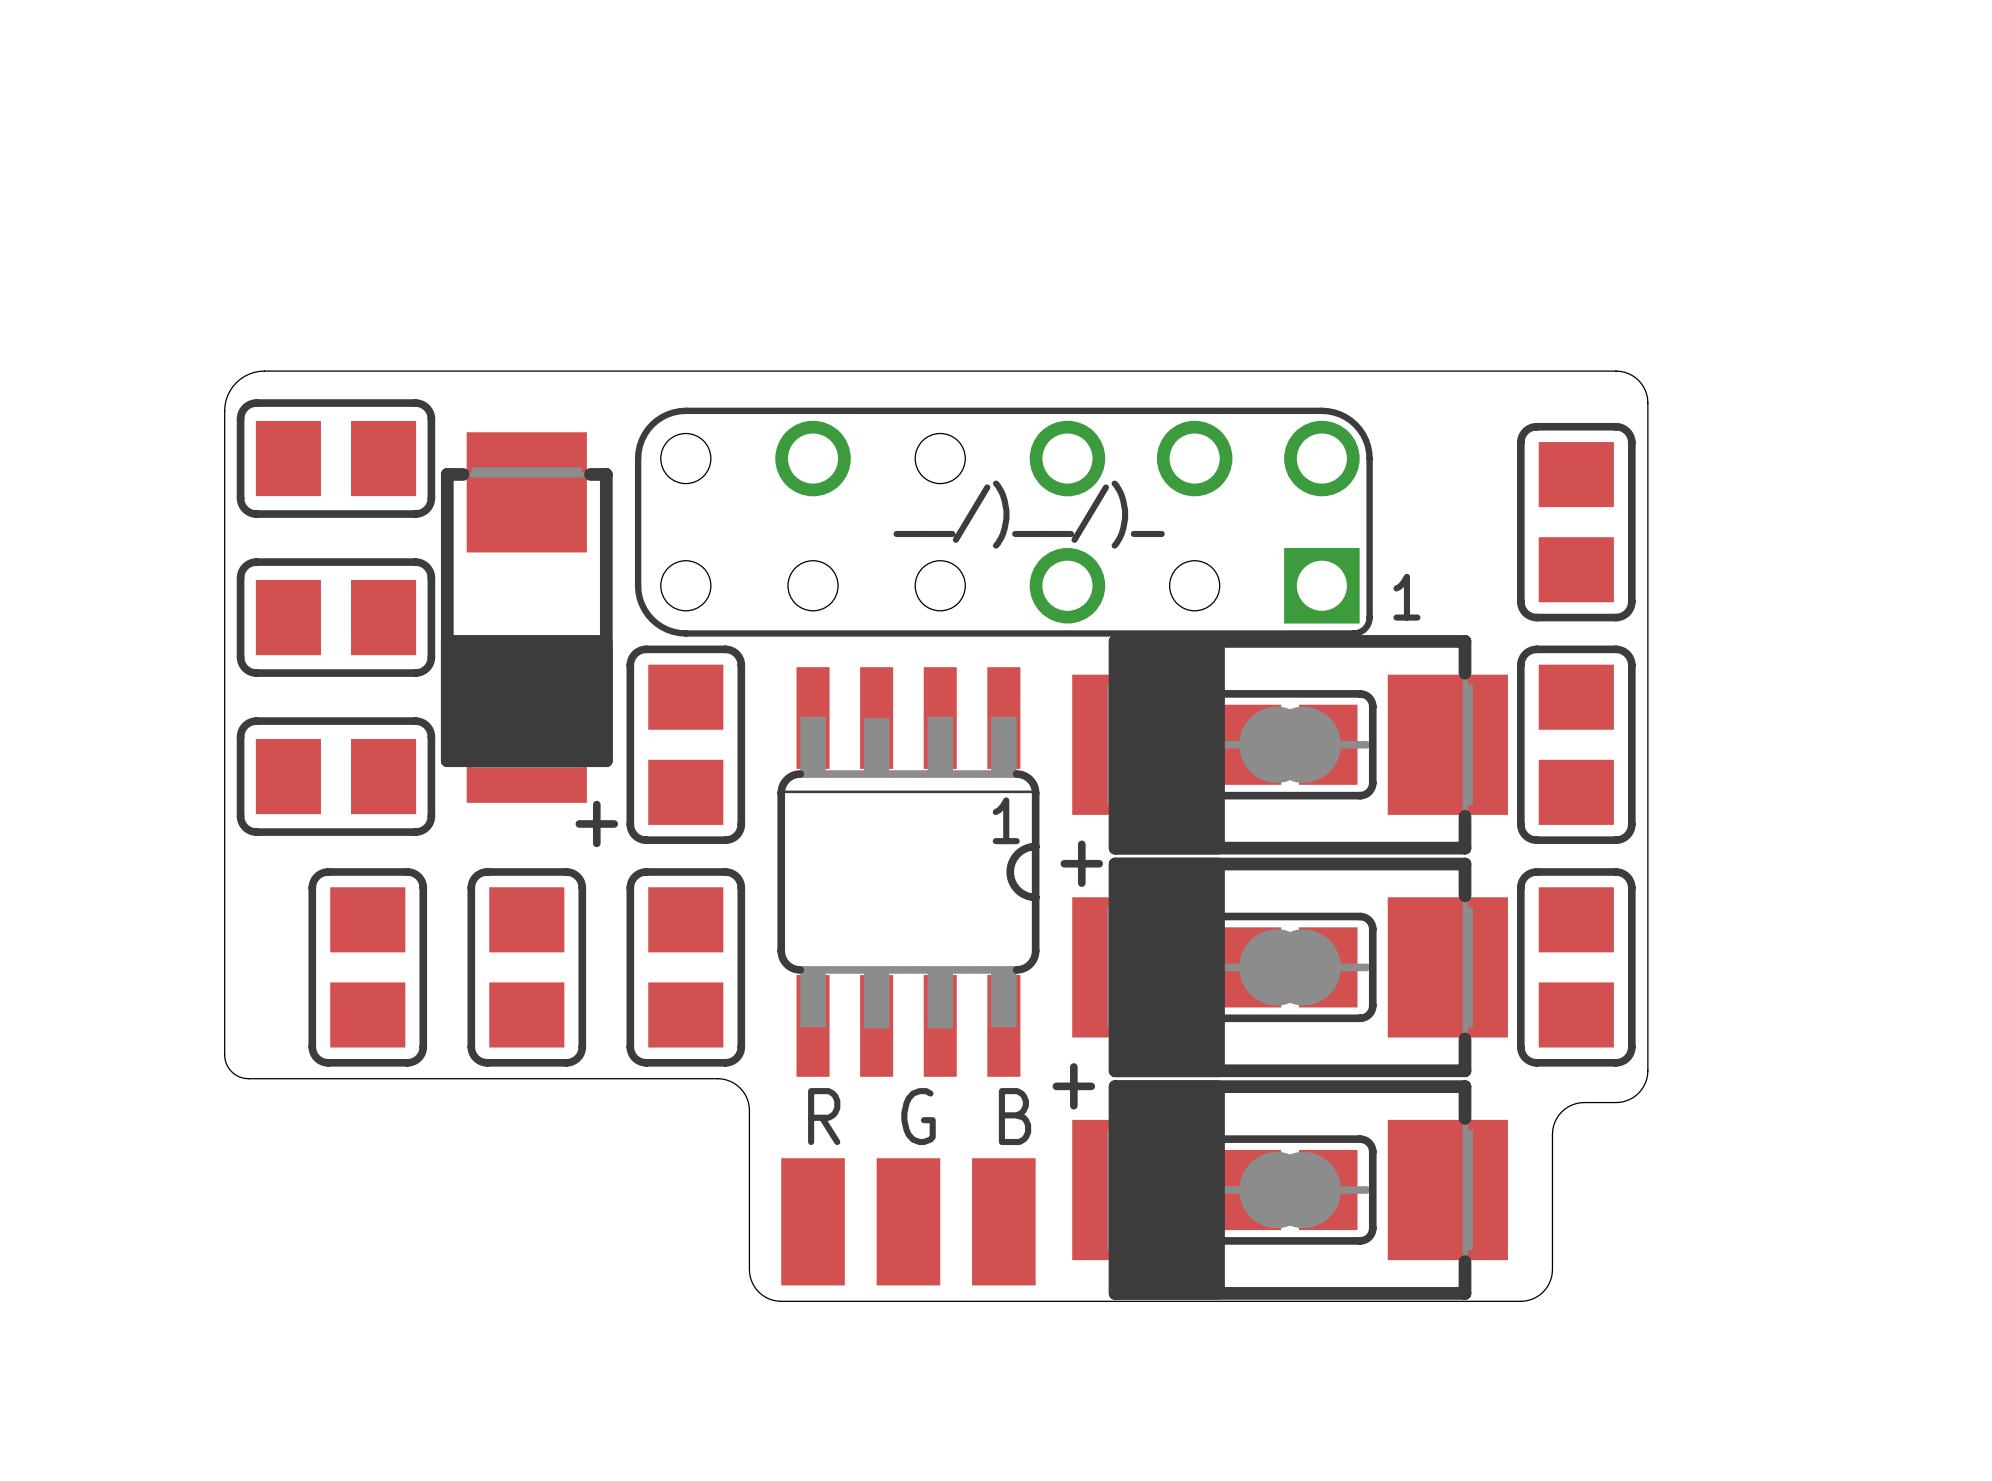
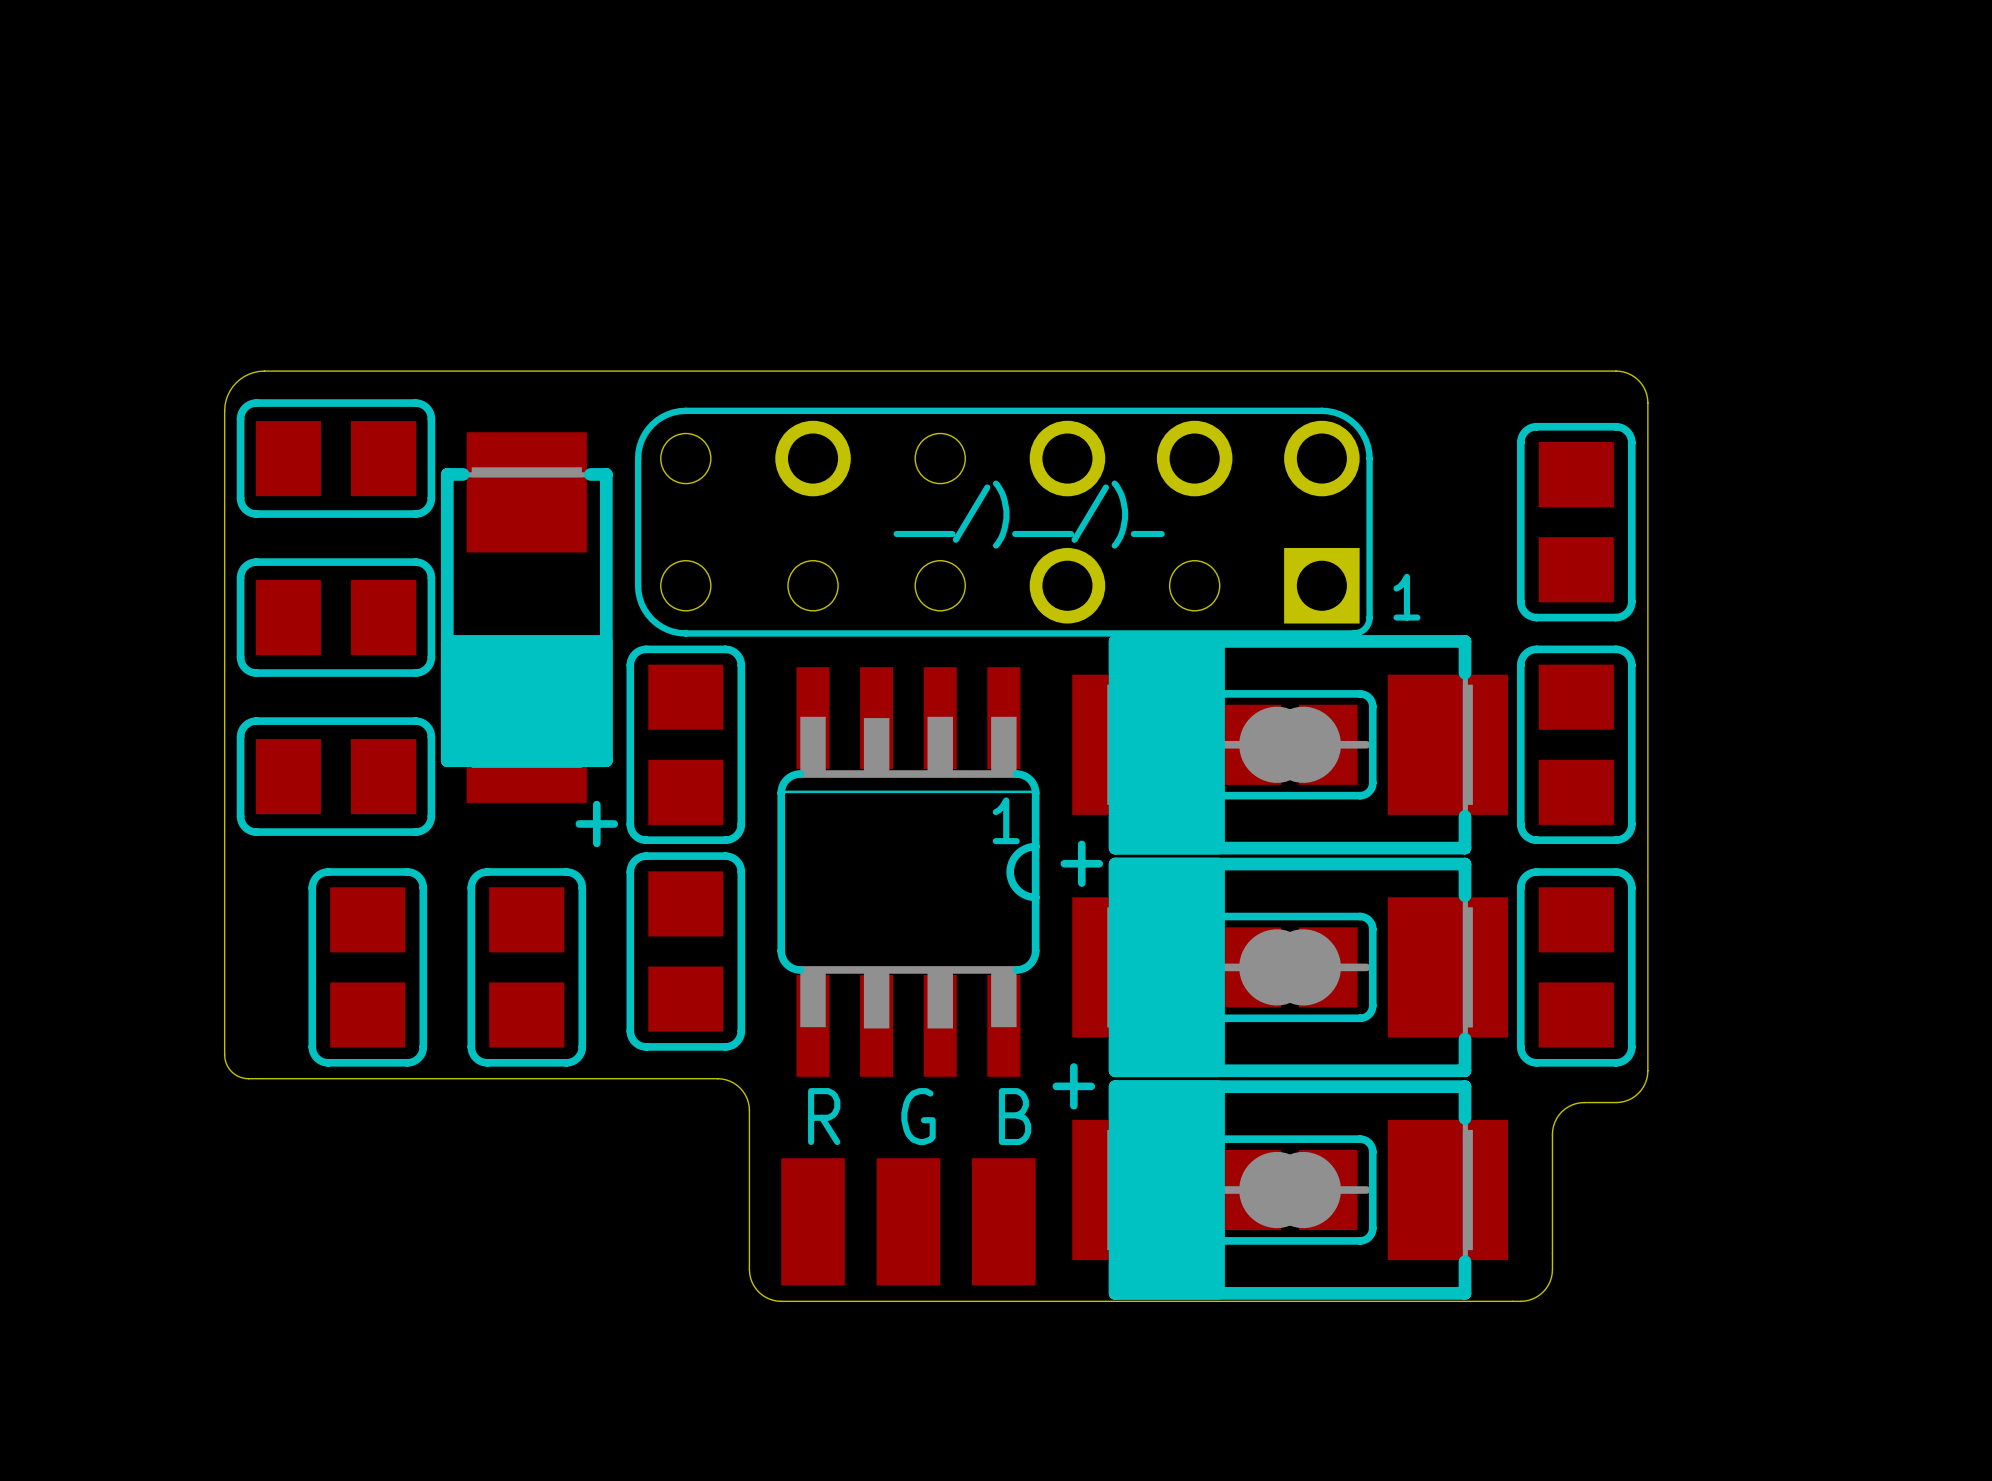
part position: (685, 967) -> (685, 951)

